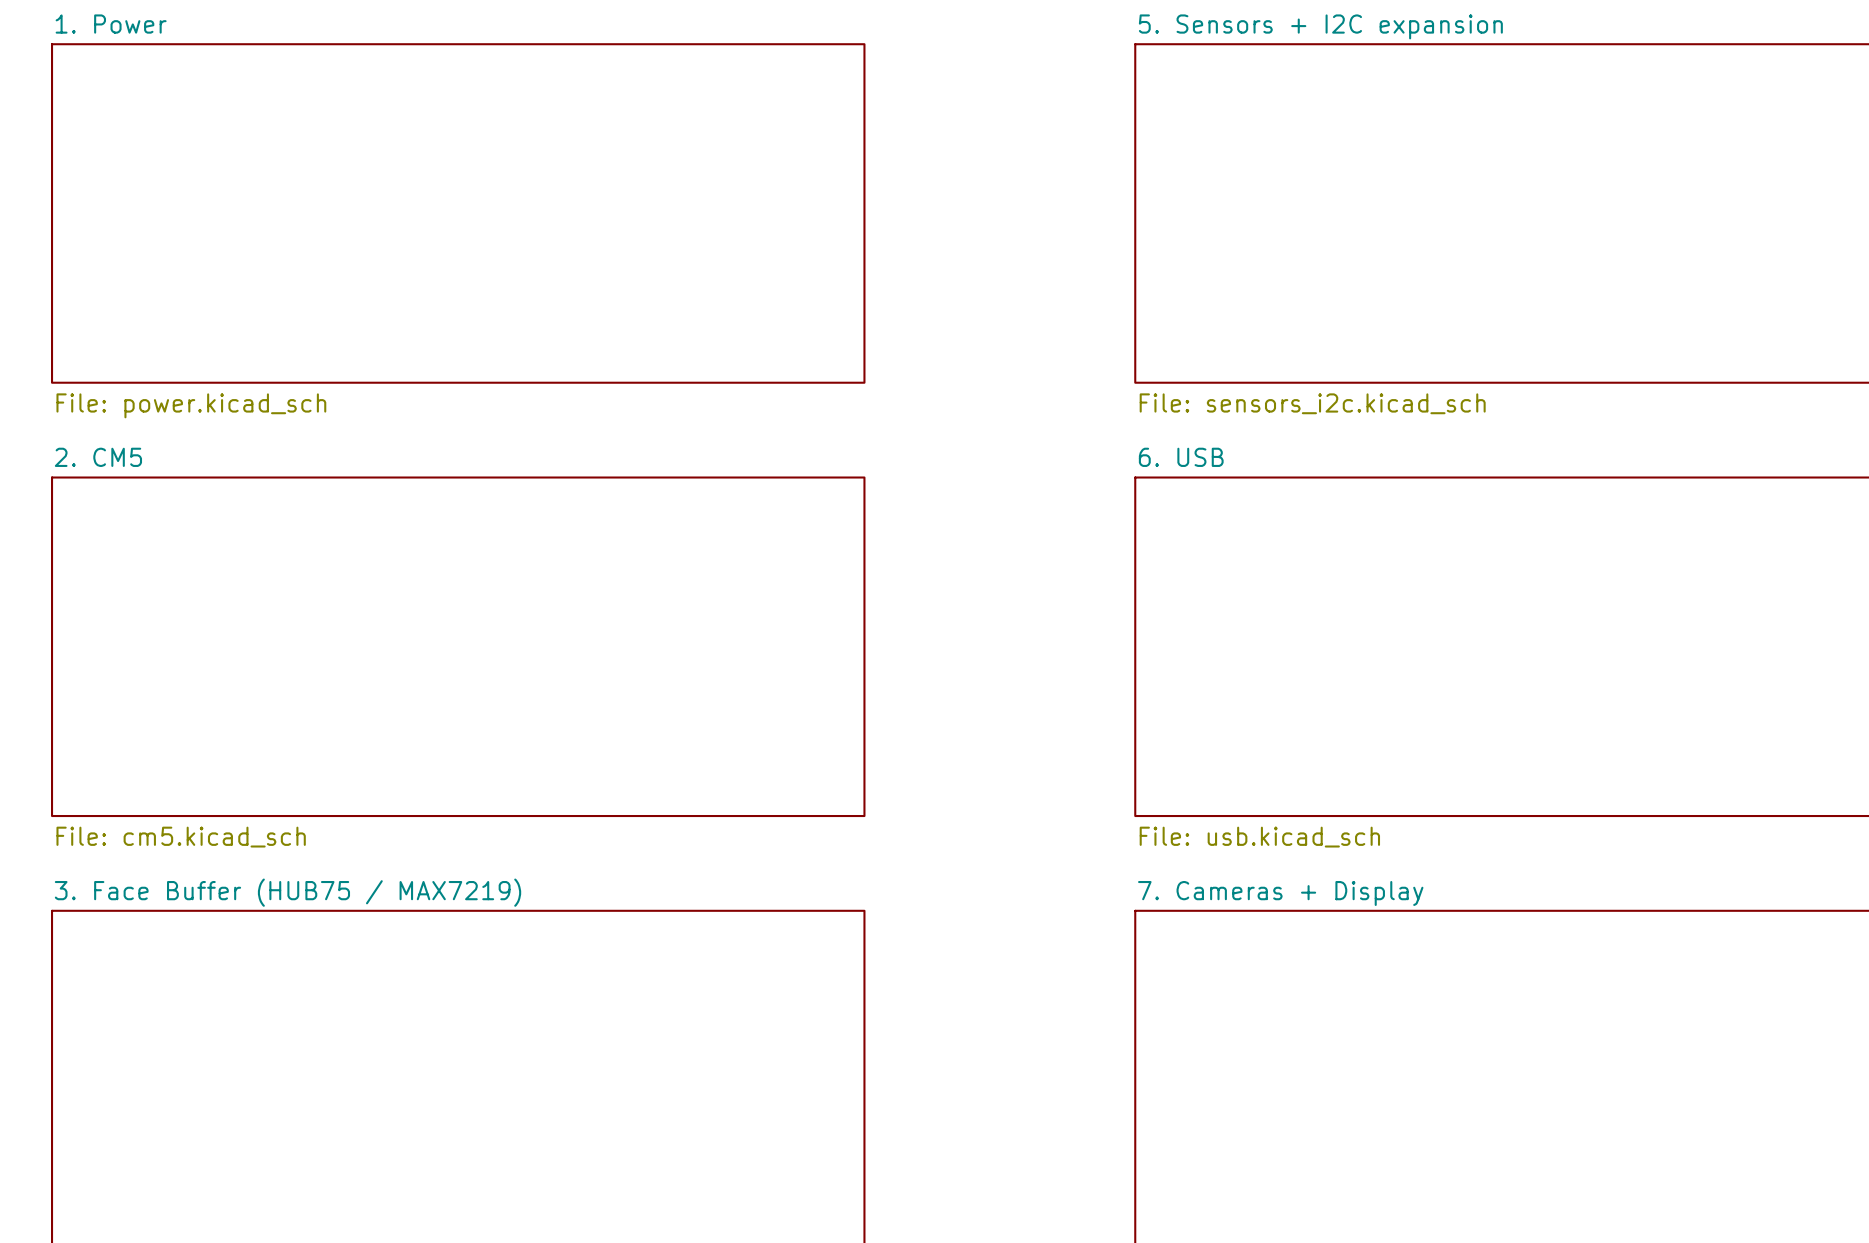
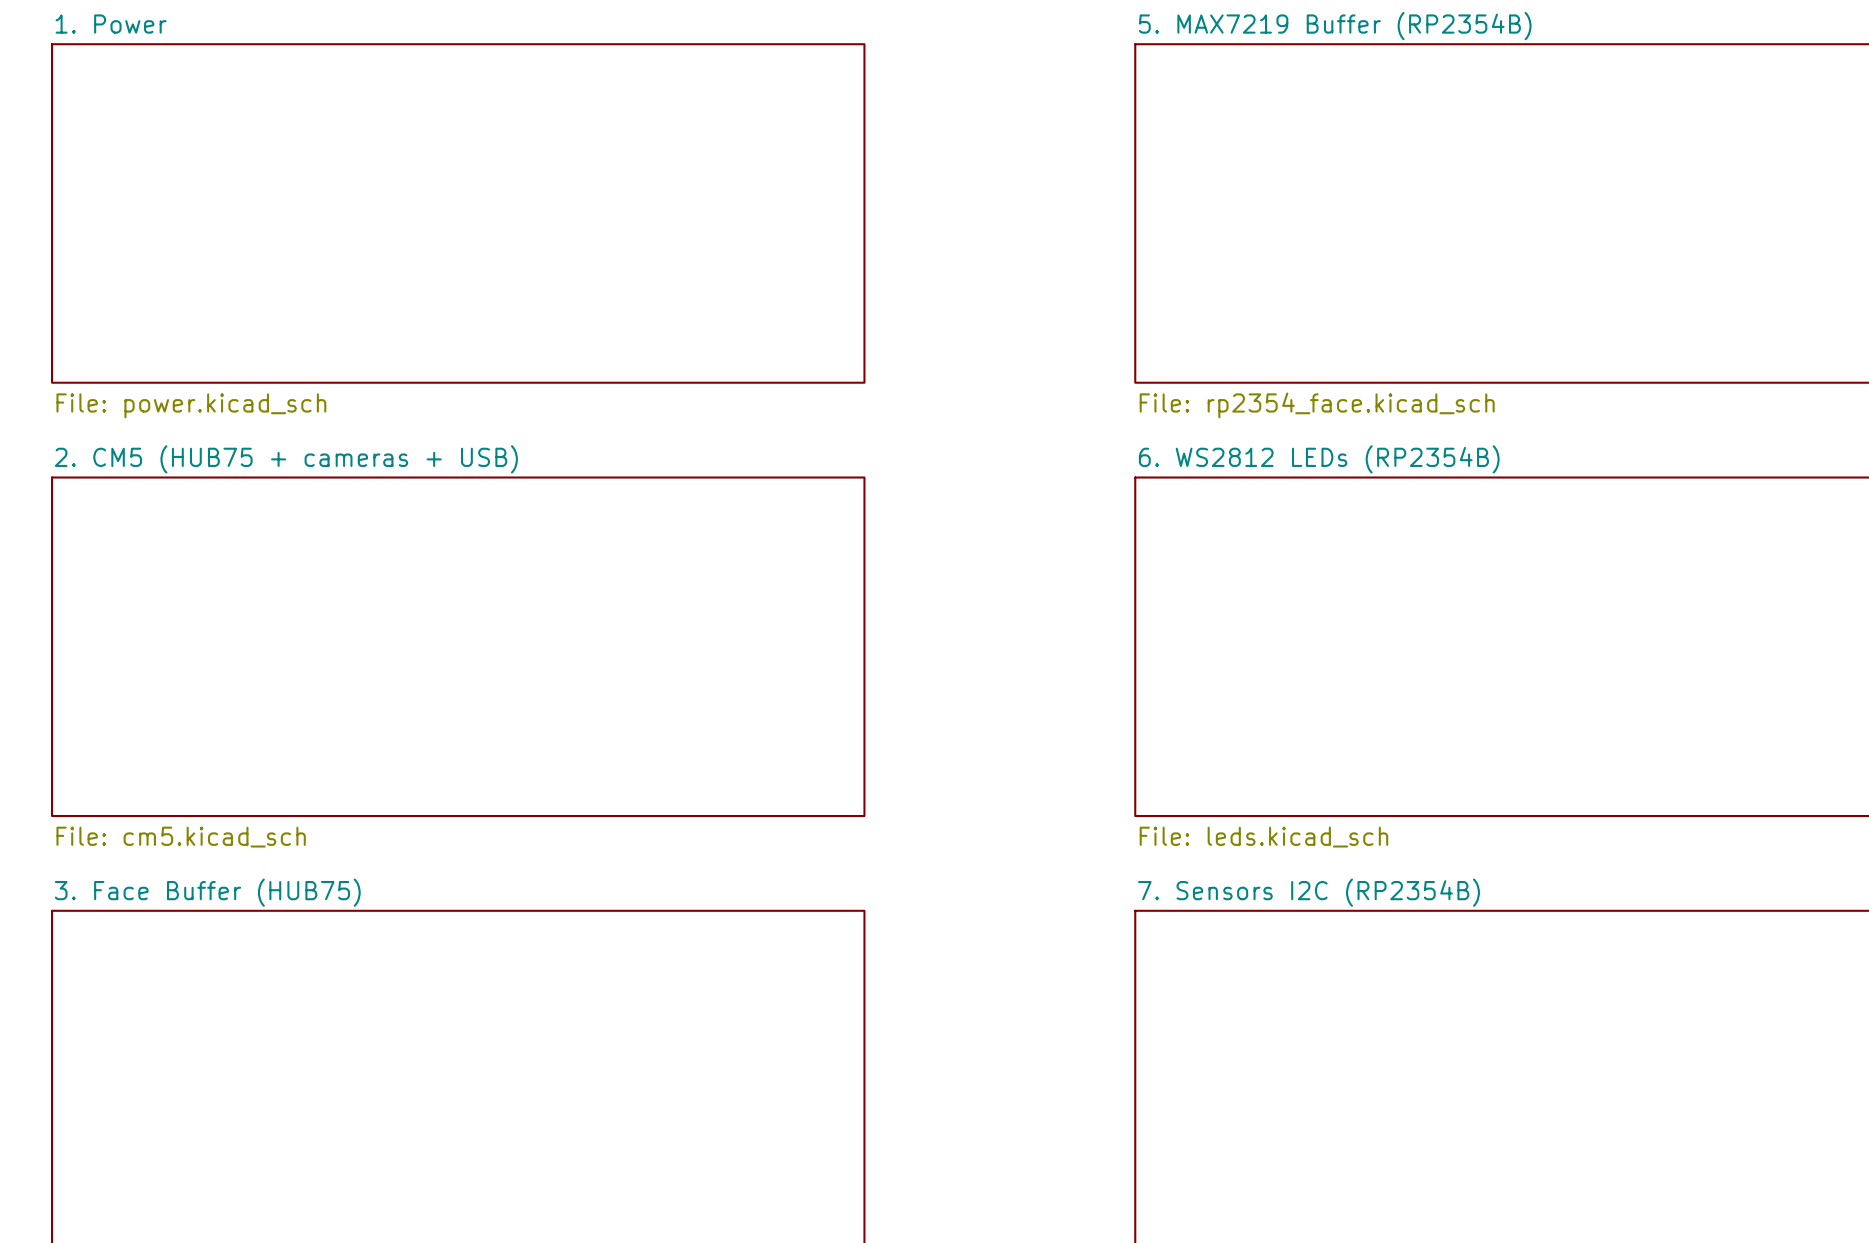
sheet 5. Sensors + I2C expansion name: 5. Sensors + I2C expansion (1320, 26) -> 5. MAX7219 Buffer (RP2354B) (1335, 26)
sheet 5. Sensors + I2C expansion value: File: sensors_i2c.kicad_sch (1312, 403) -> File: rp2354_face.kicad_sch (1317, 405)
sheet 2. CM5 name: 2. CM5 (98, 457) -> 2. CM5 (HUB75 + cameras + USB) (286, 459)
sheet 6. USB name: 6. USB (1181, 457) -> 6. WS2812 LEDs (RP2354B) (1319, 459)
sheet 6. USB value: File: usb.kicad_sch (1259, 837) -> File: leds.kicad_sch (1263, 837)
sheet 3. Face Buffer (HUB75 / MAX7219) name: 3. Face Buffer (HUB75 / MAX7219) (287, 892) -> 3. Face Buffer (HUB75) (207, 892)
sheet 7. Cameras + Display name: 7. Cameras + Display (1280, 893) -> 7. Sensors I2C (RP2354B) (1308, 892)

